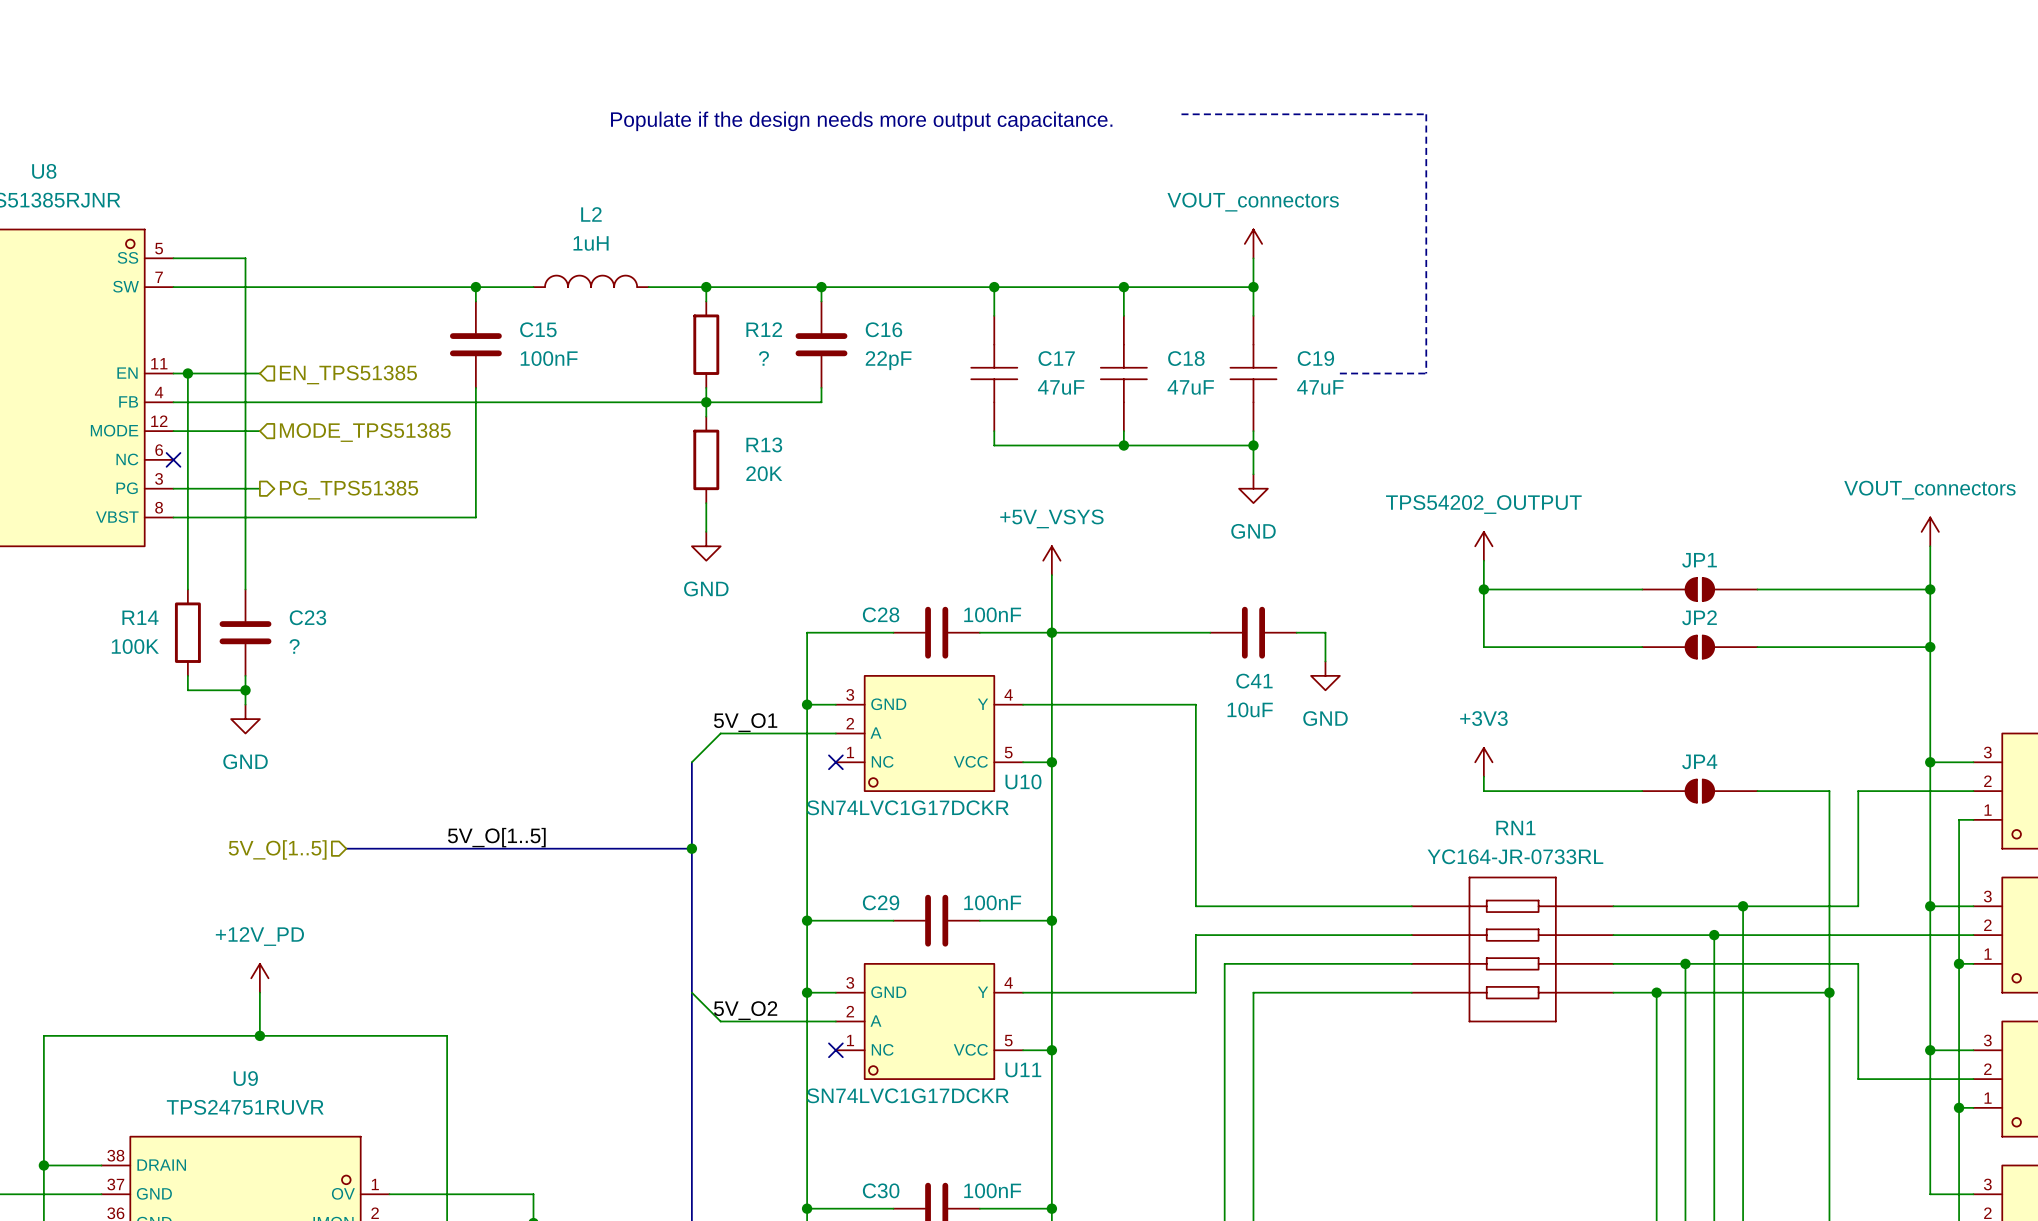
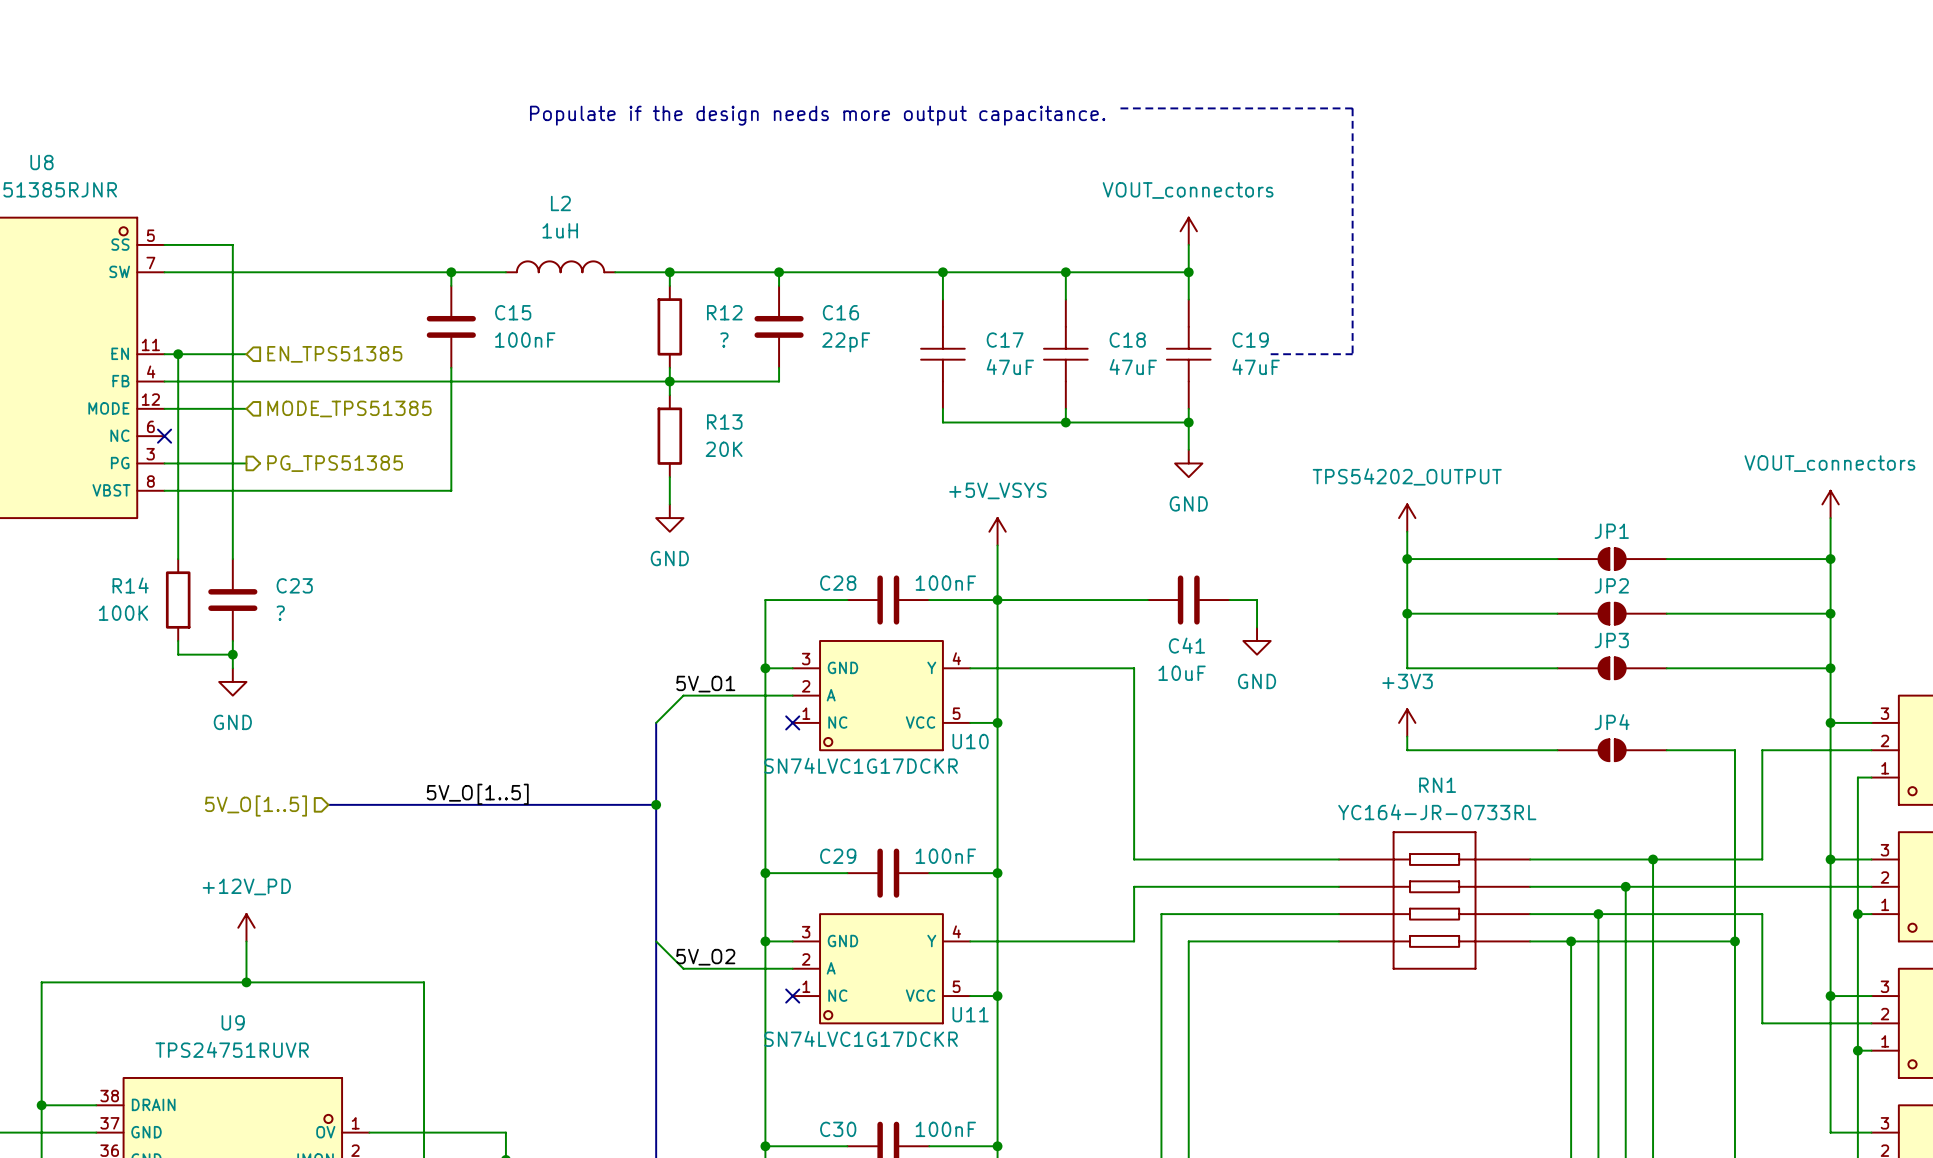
wire: none -> (1407, 613) (1407, 668) (1557, 668)
junction: none -> (1407, 613)
JP3: none -> (1612, 668)
wire: none -> (1666, 668) (1830, 668)
junction: none -> (1830, 668)

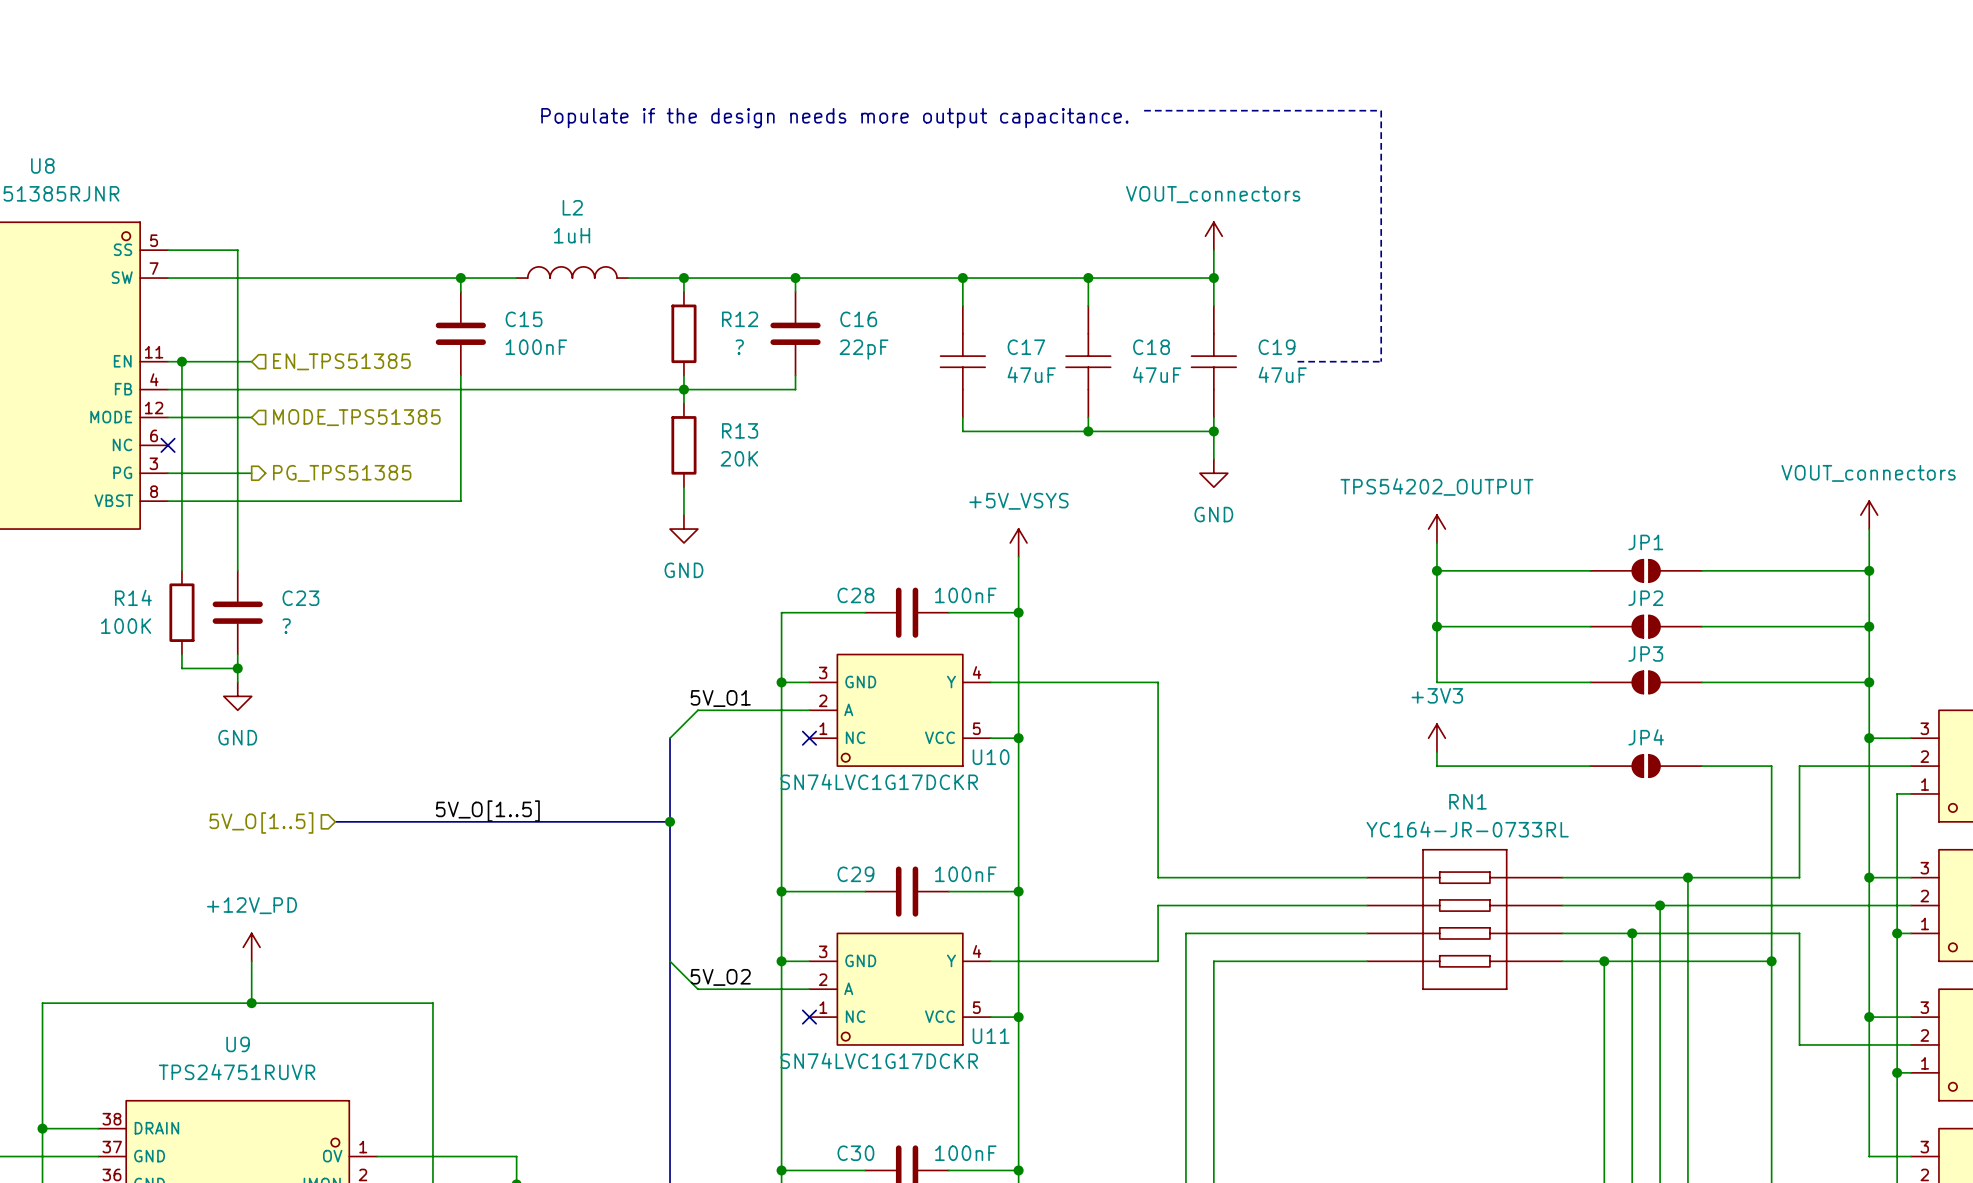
wire: (997, 600) (1147, 600) -> none
C41: 10uF (1188, 600) -> none
wire: (1229, 600) (1257, 600) (1257, 627) -> none
power symbol: GND (1257, 640) -> none

